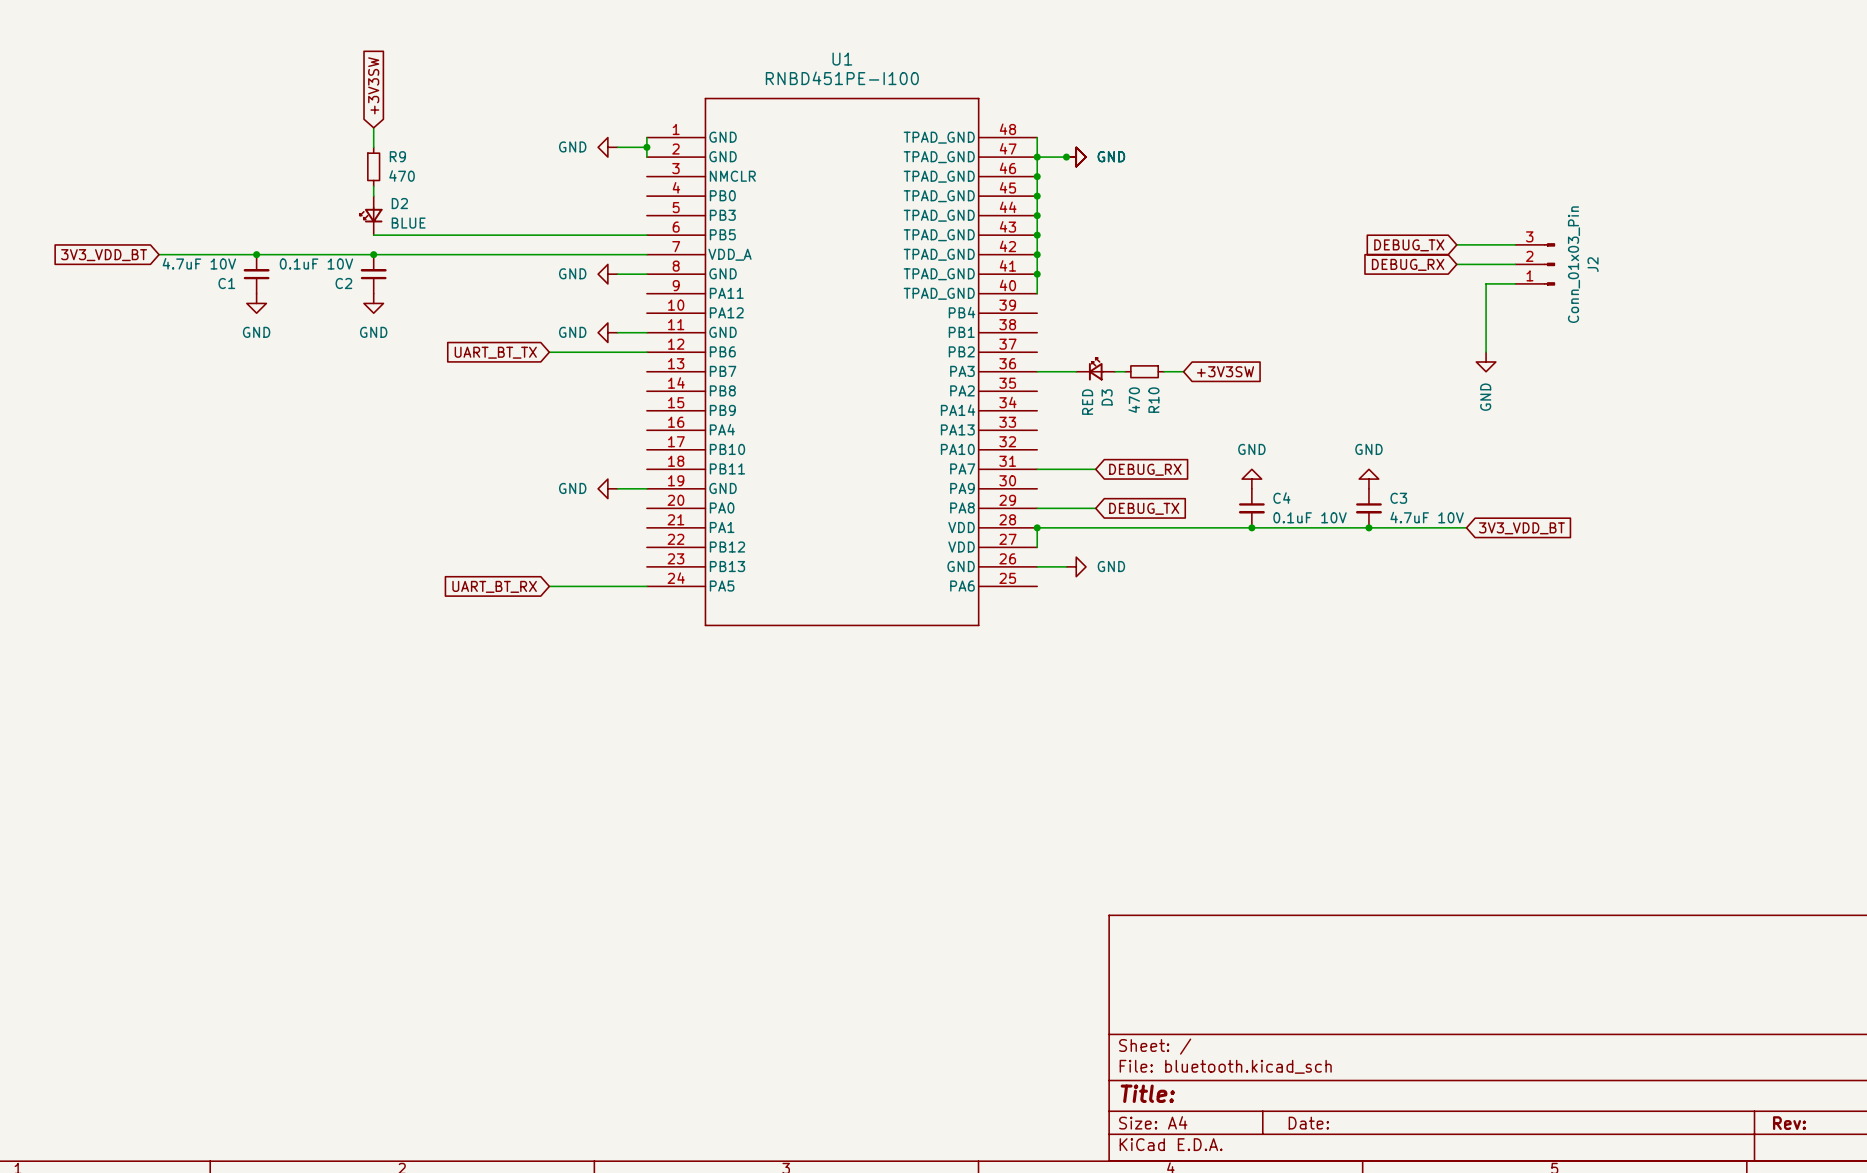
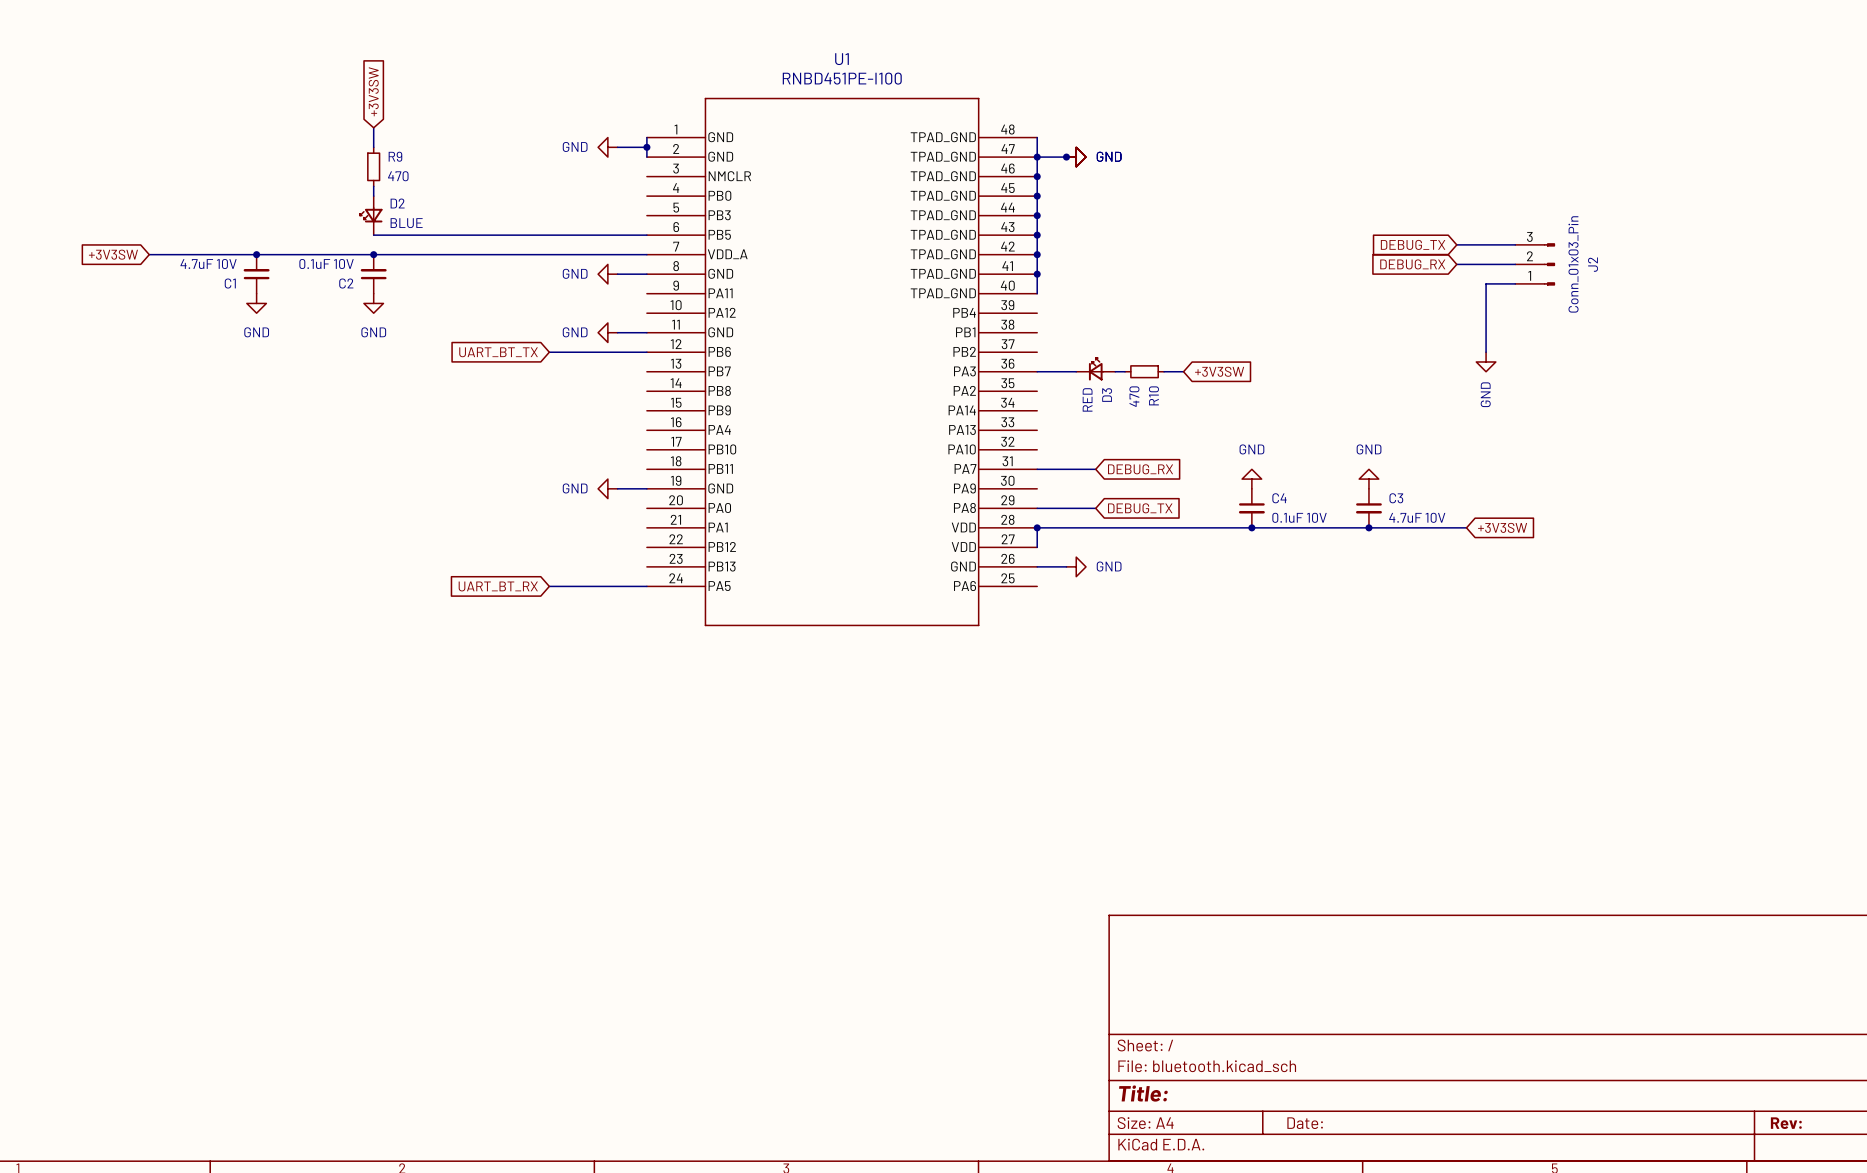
global label: none -> +3V3SW (113, 254)
wire: none -> (149, 254) (159, 254)
global label: 3V3_VDD_BT (104, 255) -> none
global label: 3V3_VDD_BT (1521, 528) -> +3V3SW (1502, 527)

